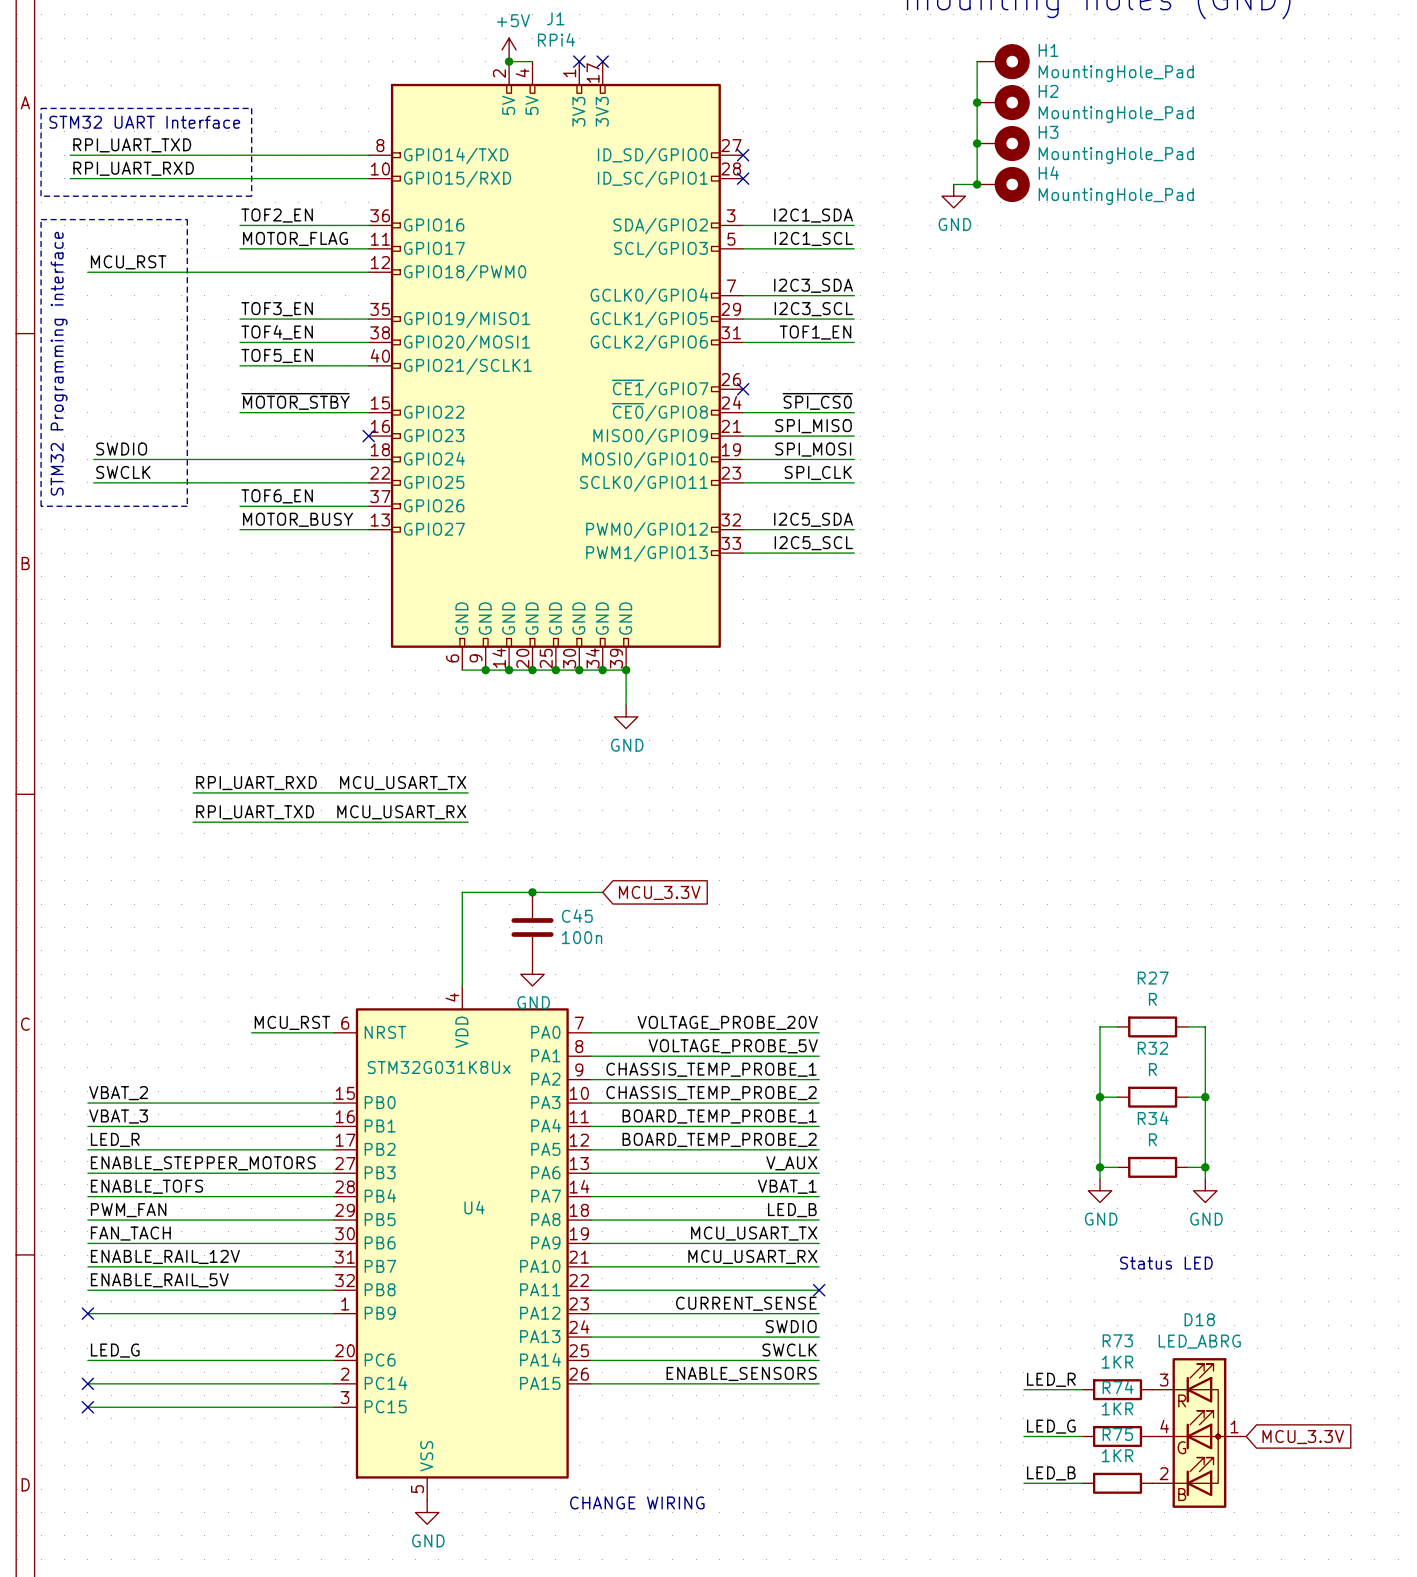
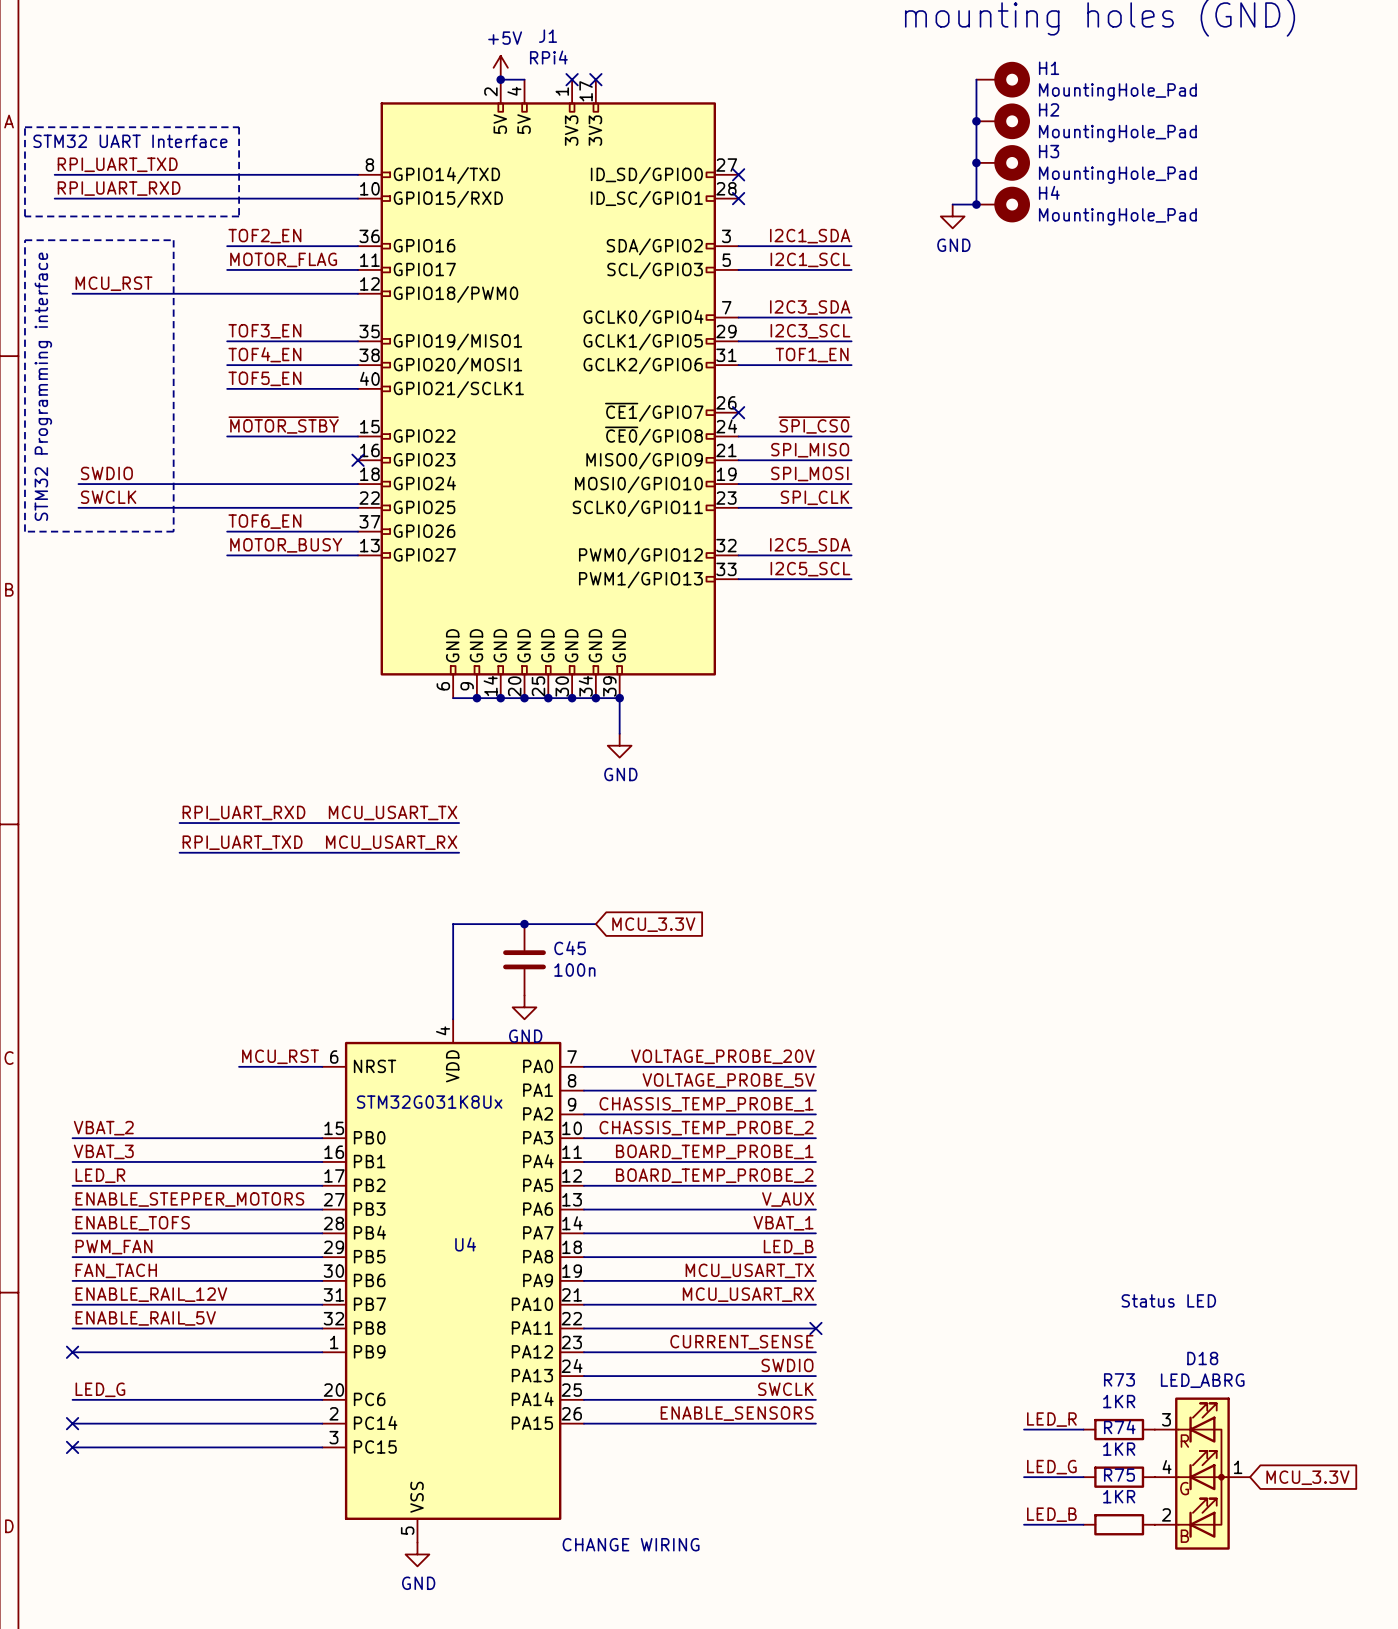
wire: (1117, 1026) (1100, 1026) (1100, 1179) -> none
R27: R (1152, 1026) -> none
wire: (1187, 1026) (1205, 1026) (1205, 1179) -> none
wire: (1100, 1097) (1117, 1097) -> none
junction: (1100, 1097) -> none
R32: R (1152, 1097) -> none
wire: (1187, 1097) (1205, 1097) -> none
junction: (1205, 1097) -> none
wire: (1100, 1167) (1117, 1167) -> none
junction: (1100, 1167) -> none
R34: R (1152, 1167) -> none
wire: (1187, 1167) (1205, 1167) -> none
junction: (1205, 1167) -> none
power symbol: GND (1100, 1190) -> none
power symbol: GND (1205, 1190) -> none

